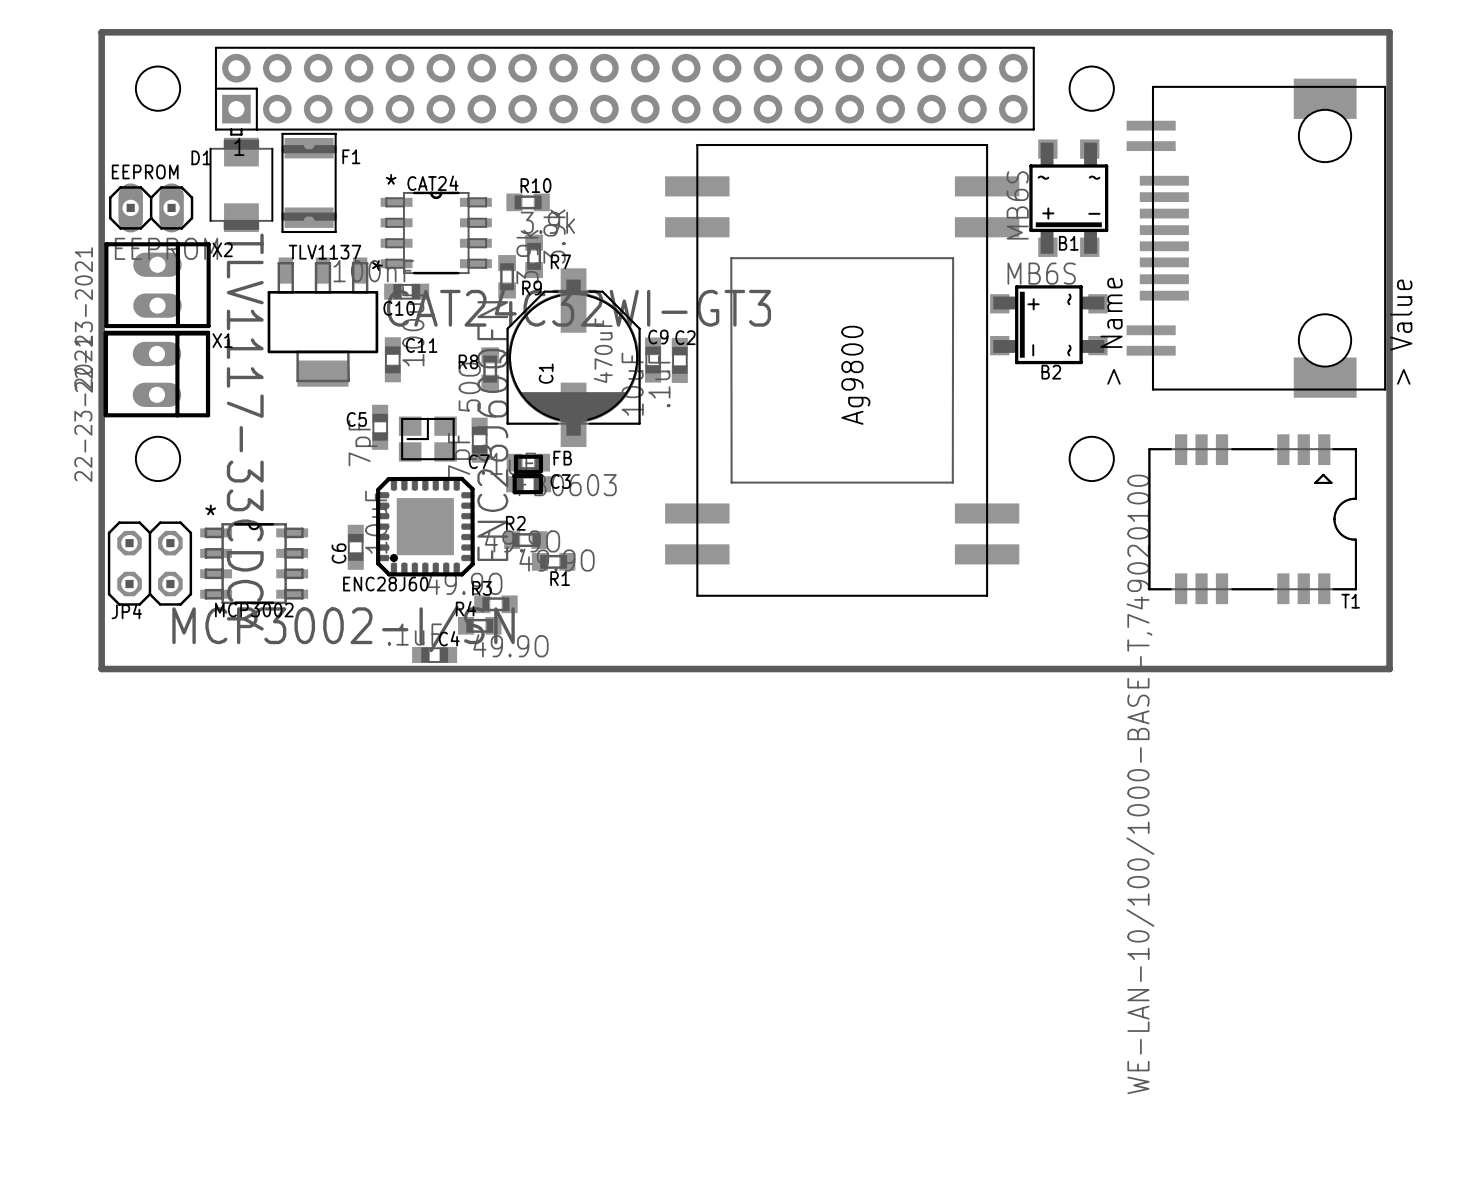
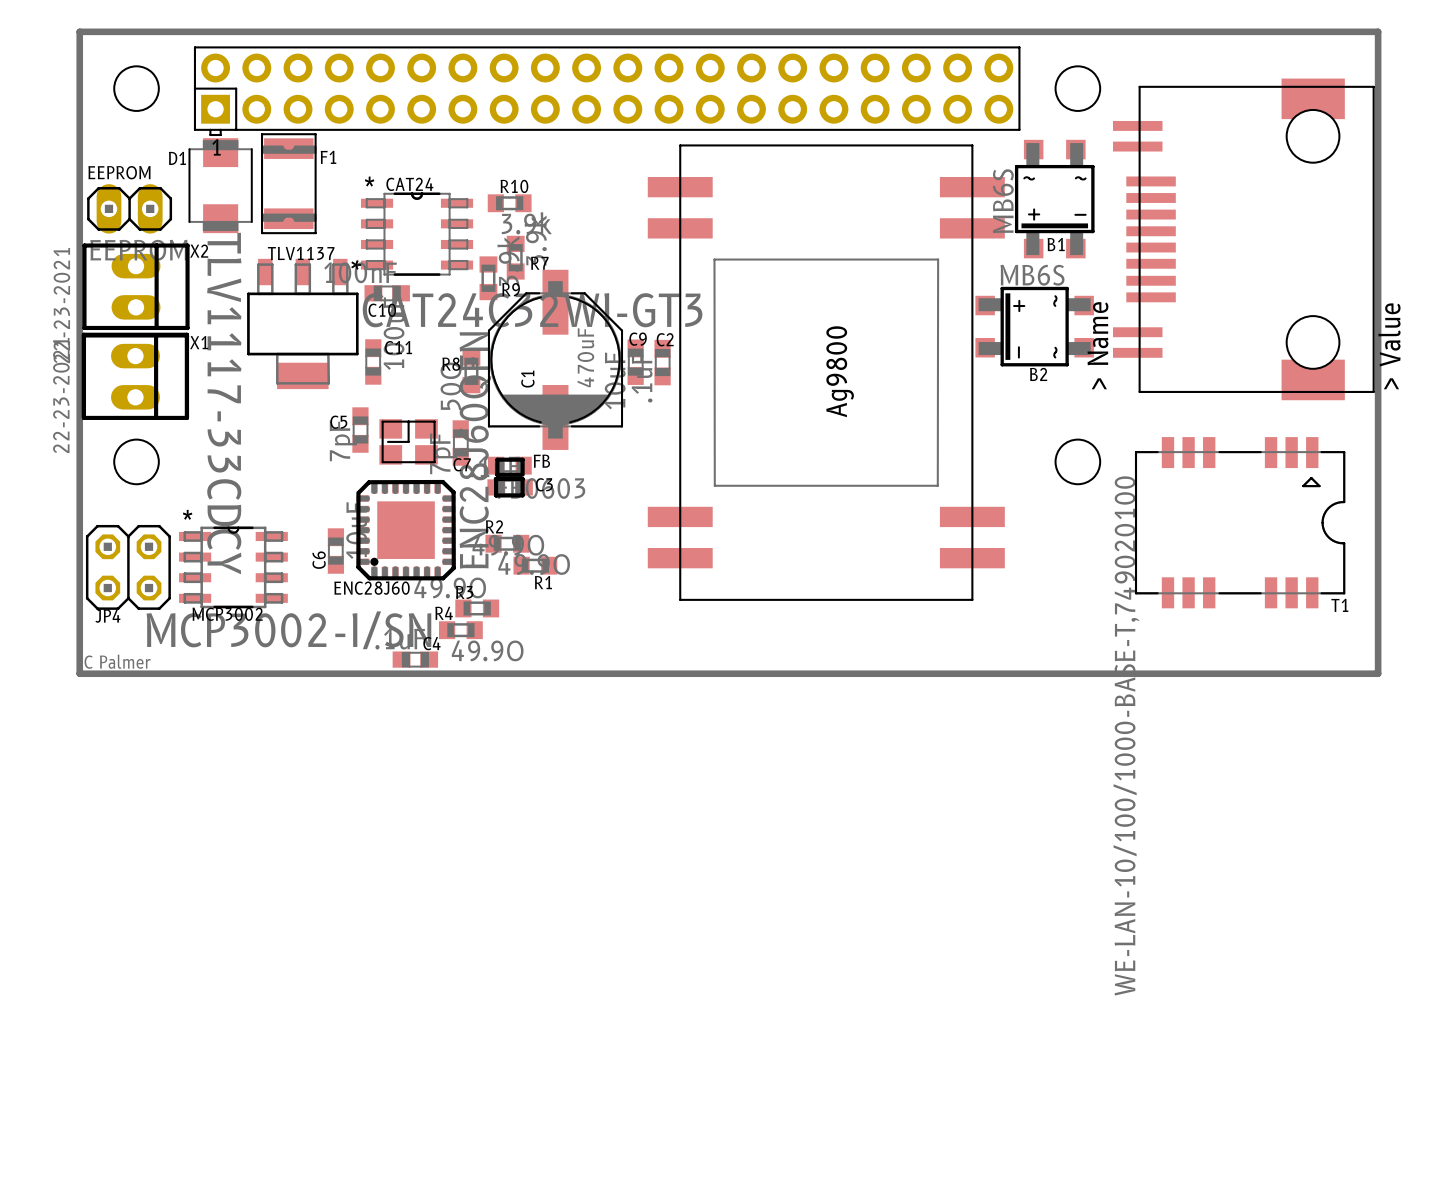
text: none -> C Palmer (117, 661)

